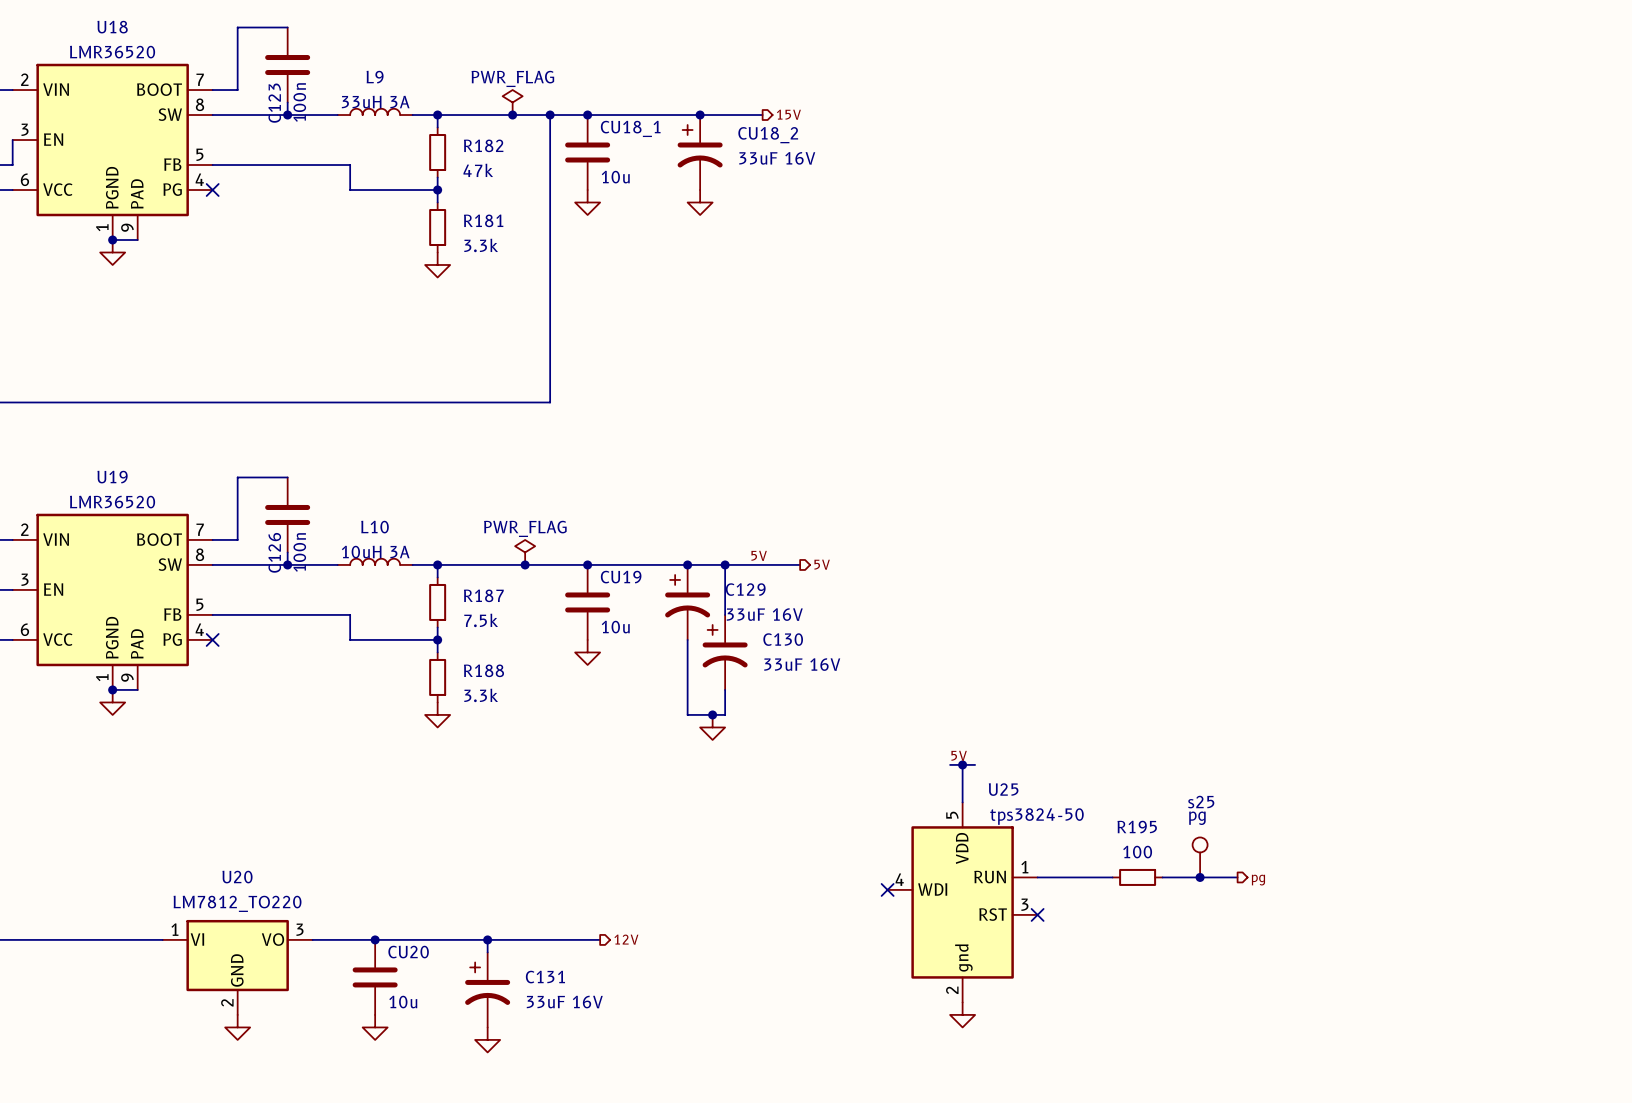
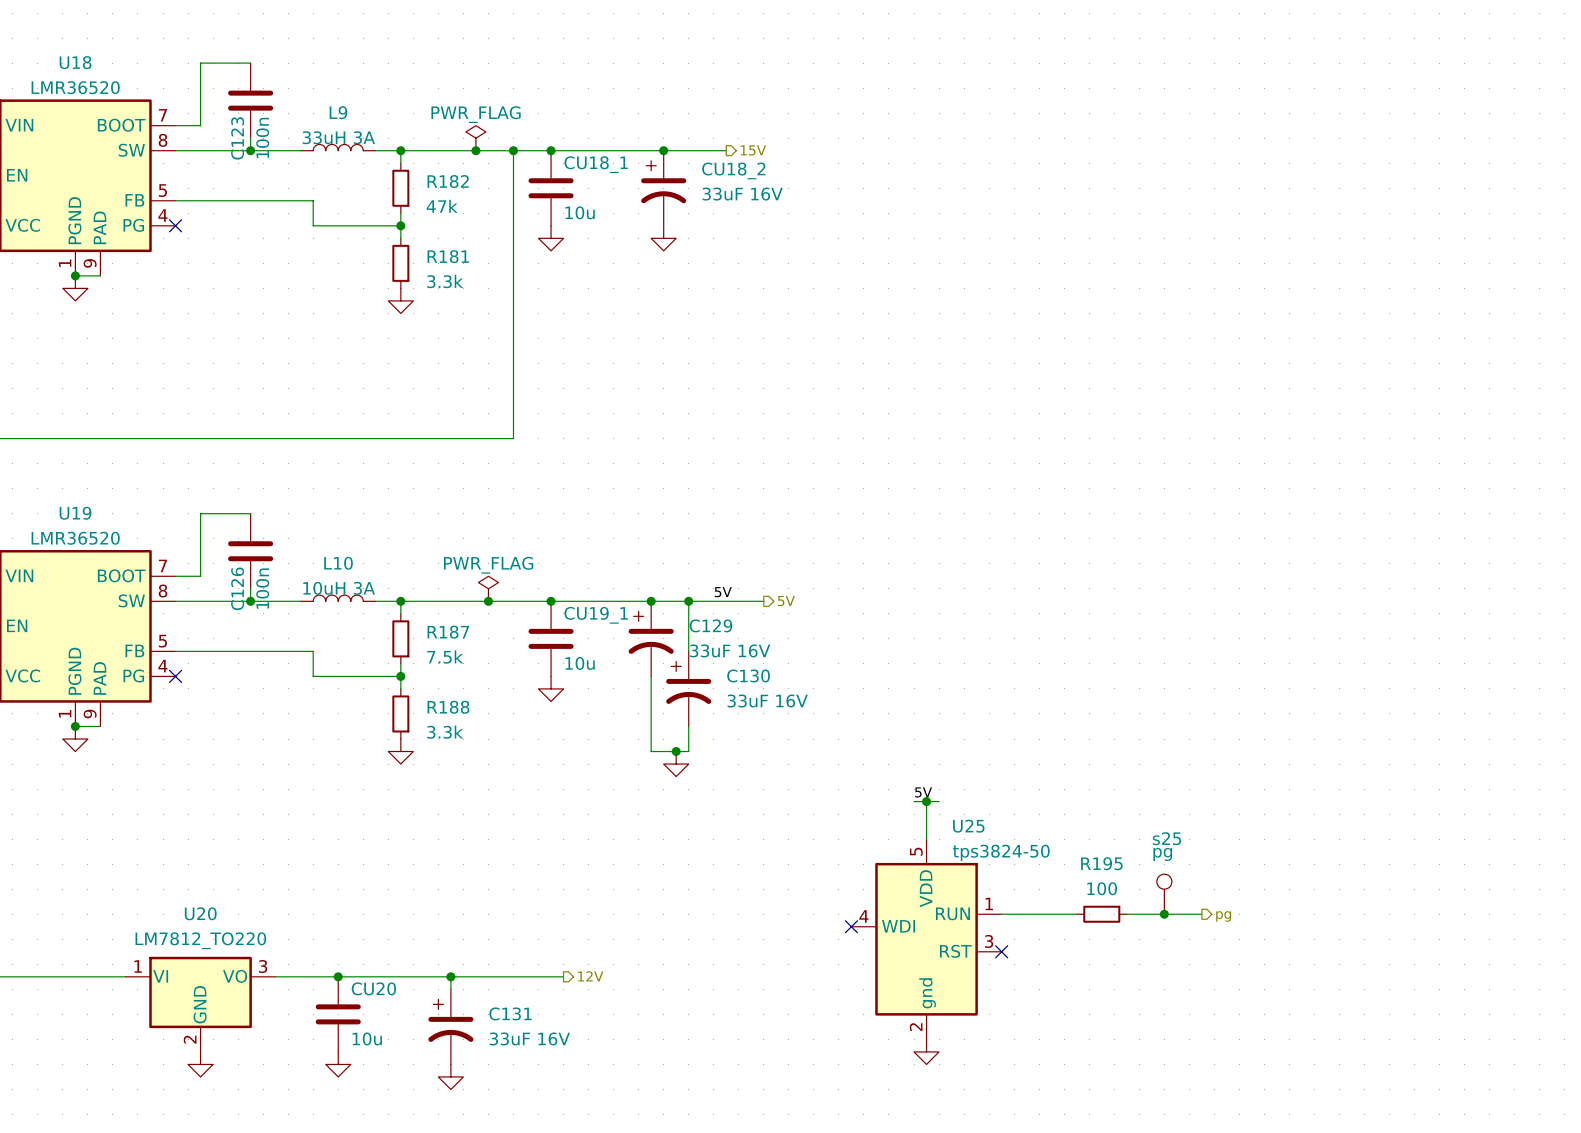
CU19 name: CU19 (621, 577) -> CU19_1 (596, 615)

